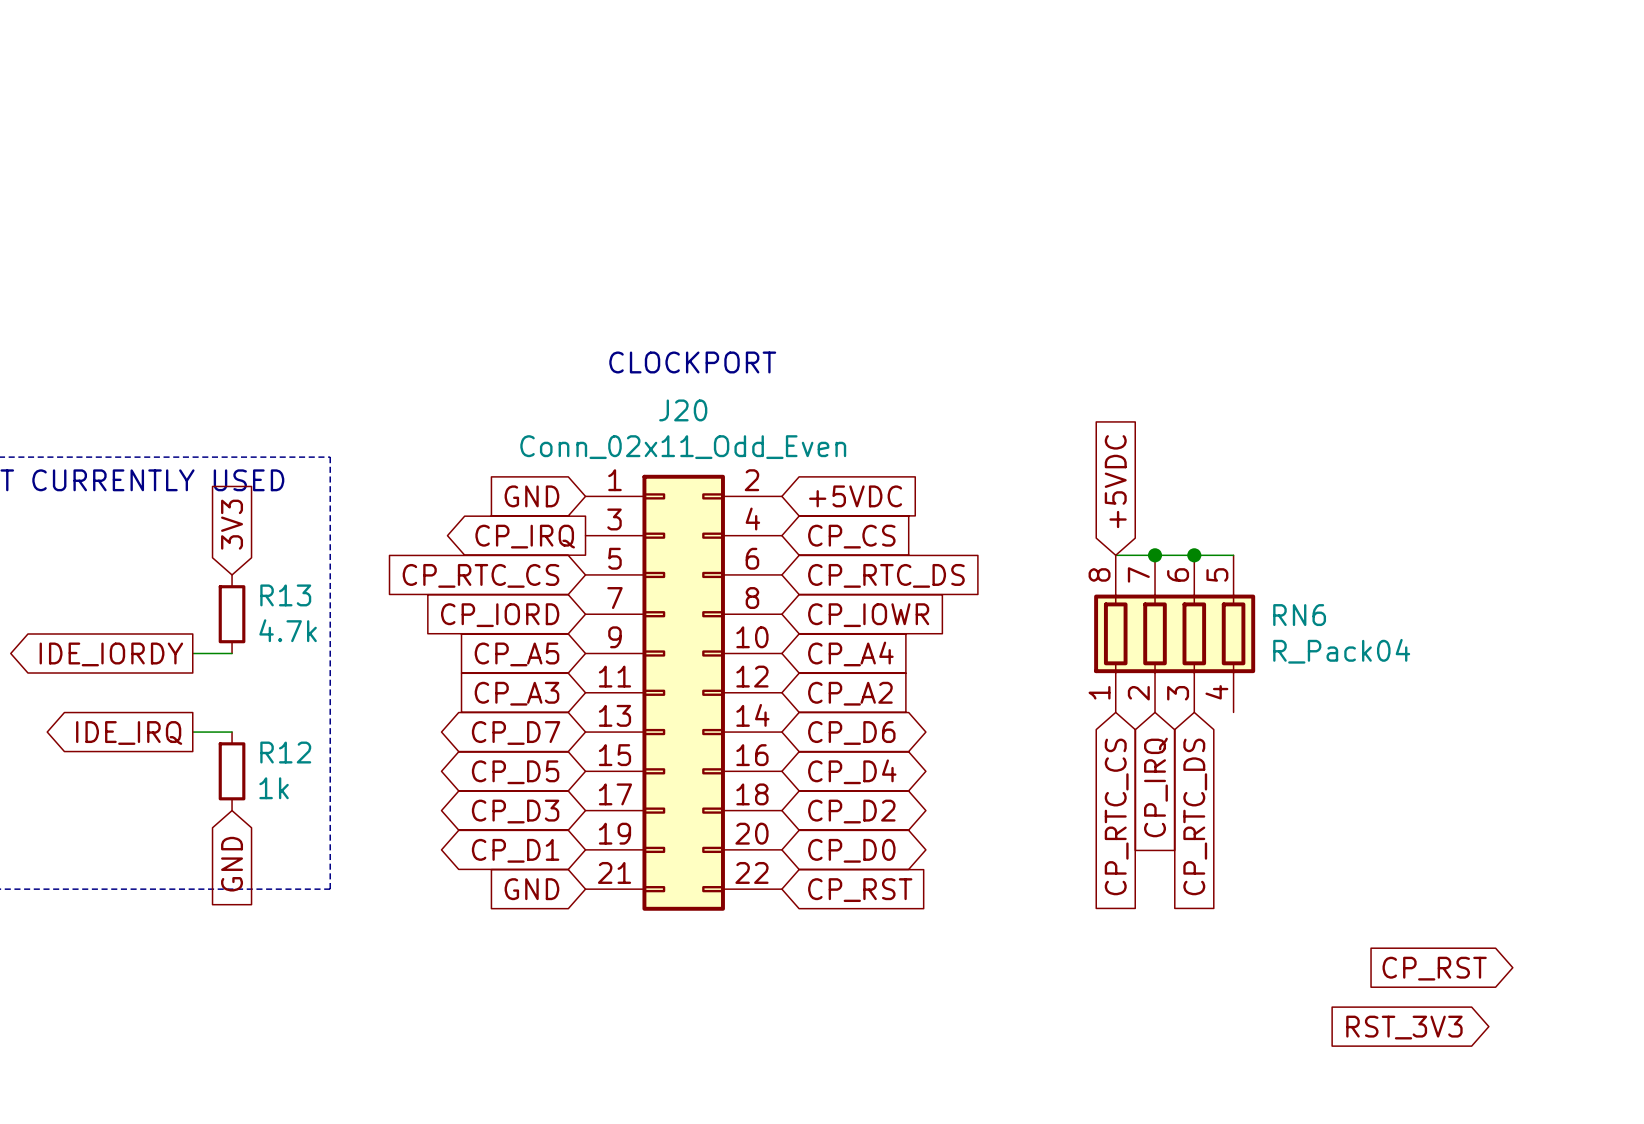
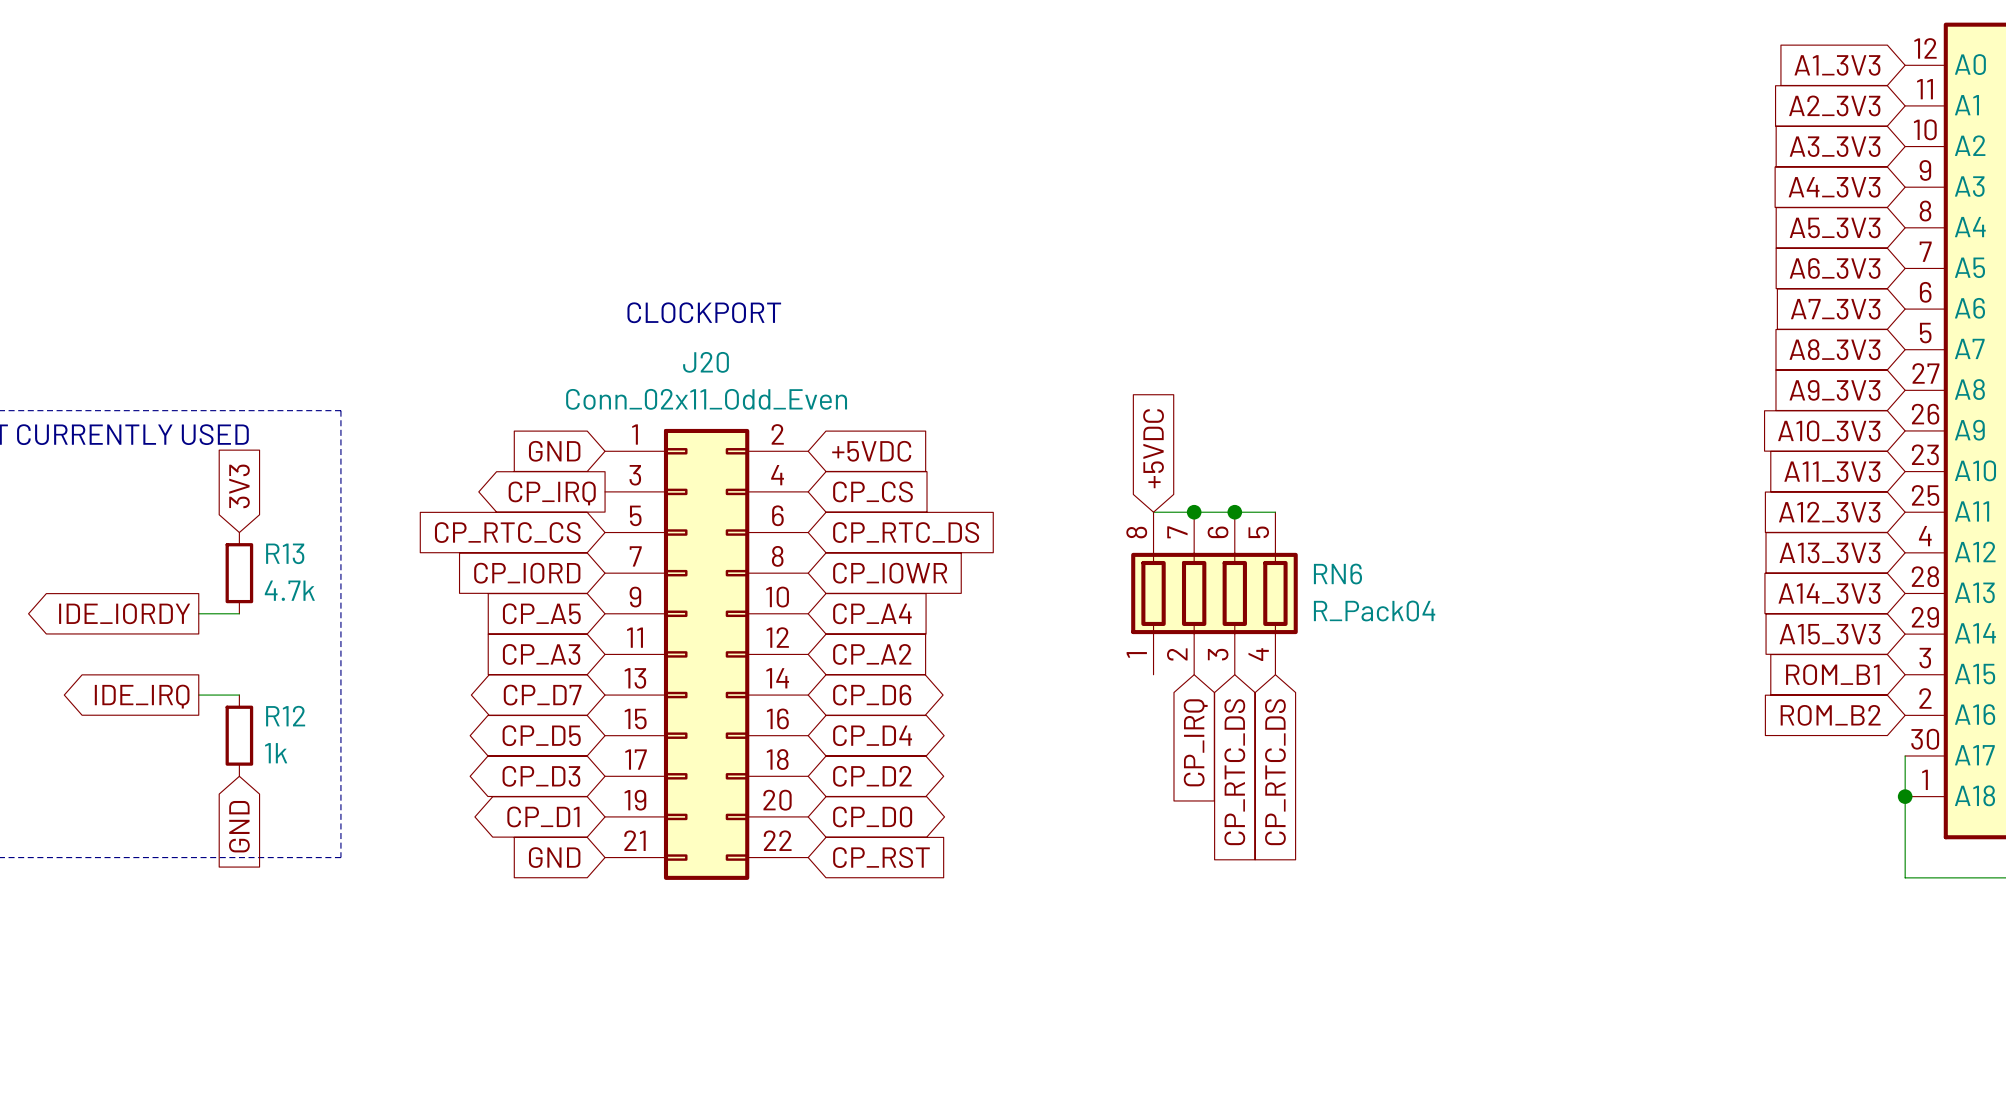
global label: CP_RTC_CS (1116, 816) -> none
global label: none -> CP_RTC_DS (1275, 772)
global label: CP_RST (1434, 968) -> none
global label: RST_3V3 (1404, 1027) -> none

